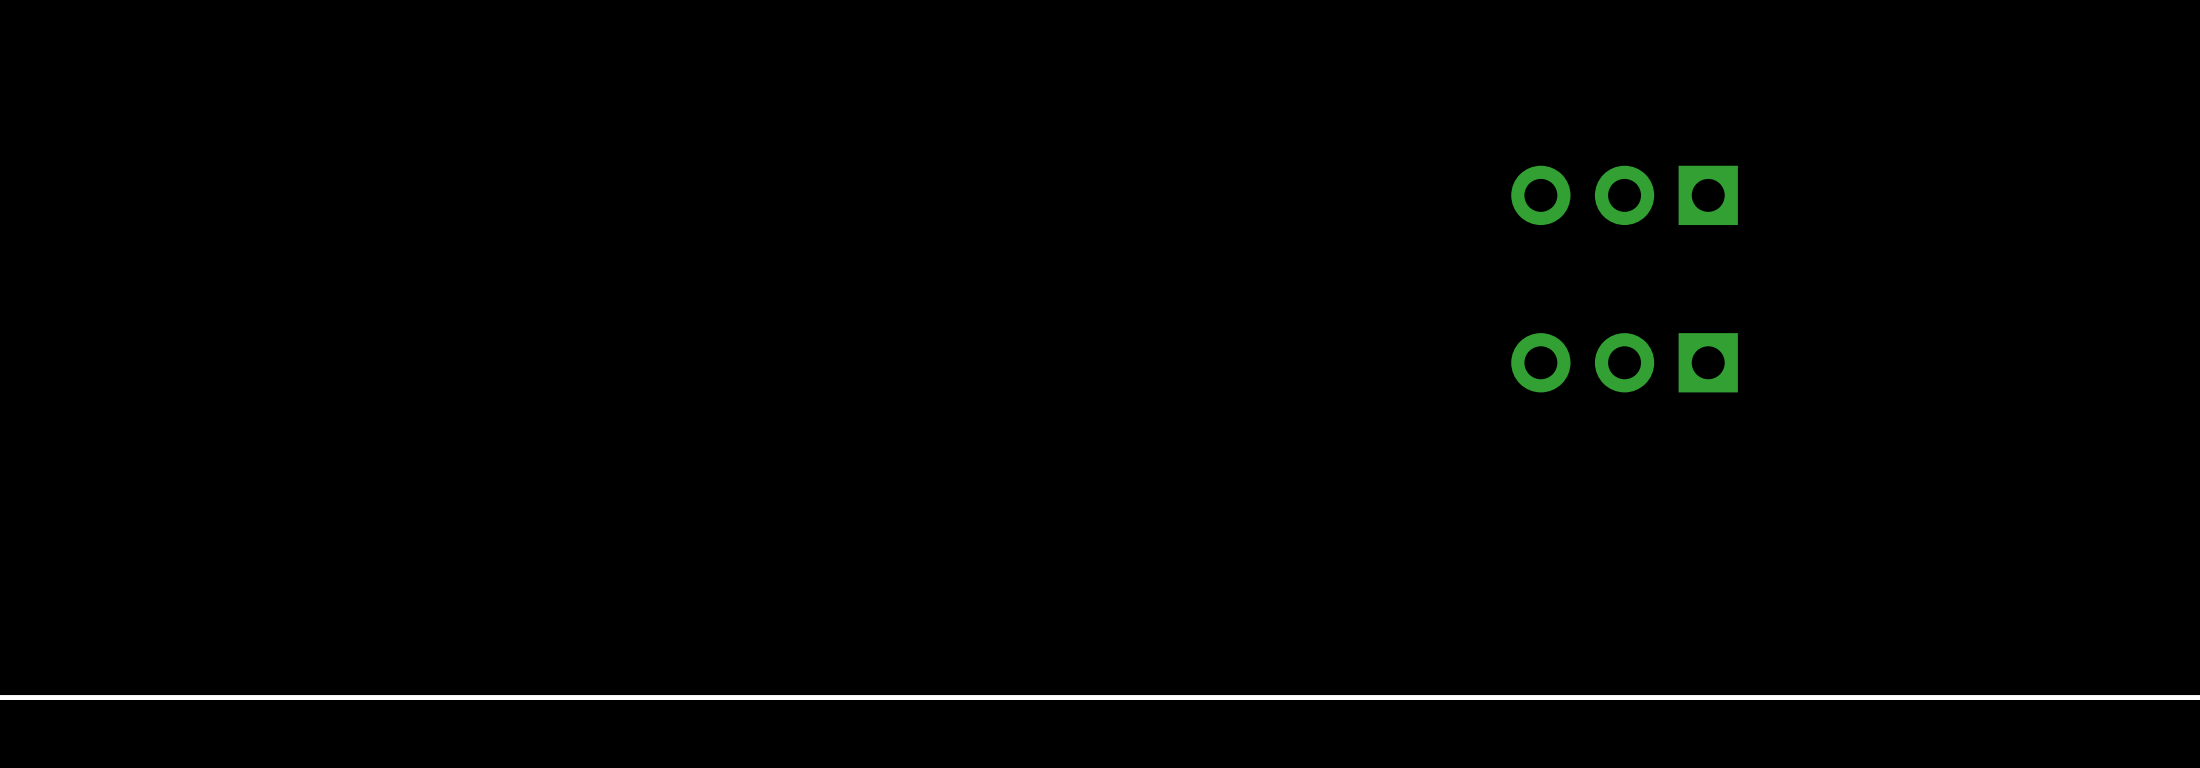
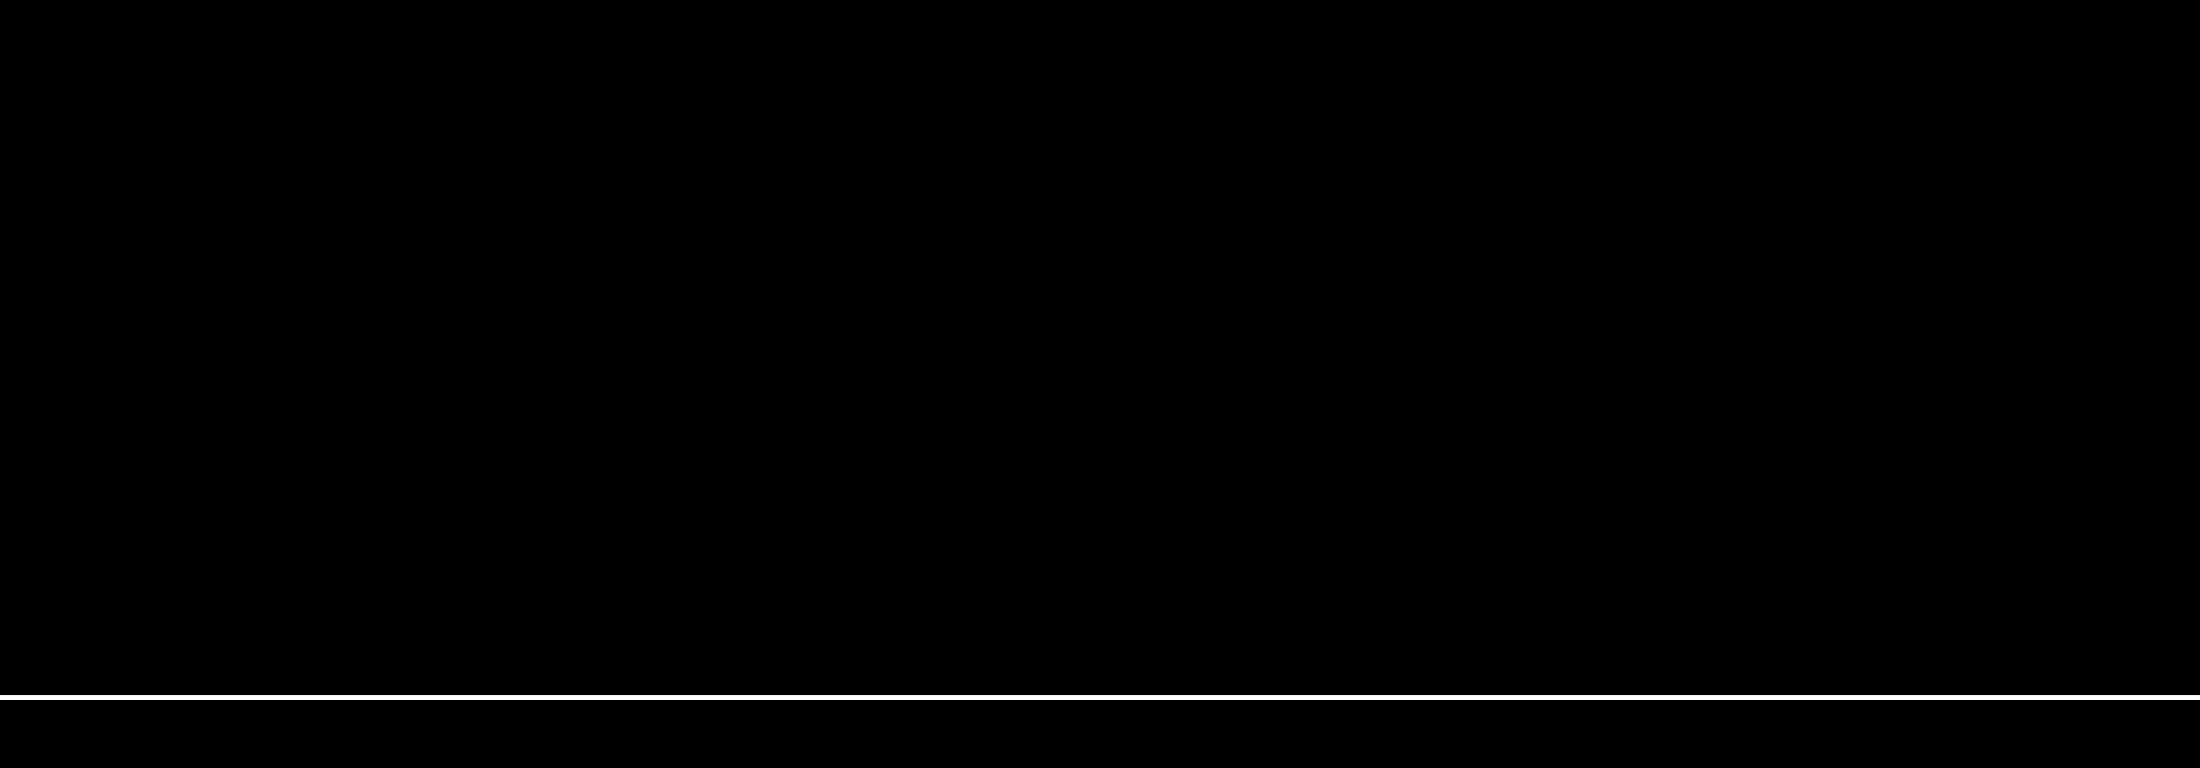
part: (1624, 195) -> none
part: (1624, 362) -> none

